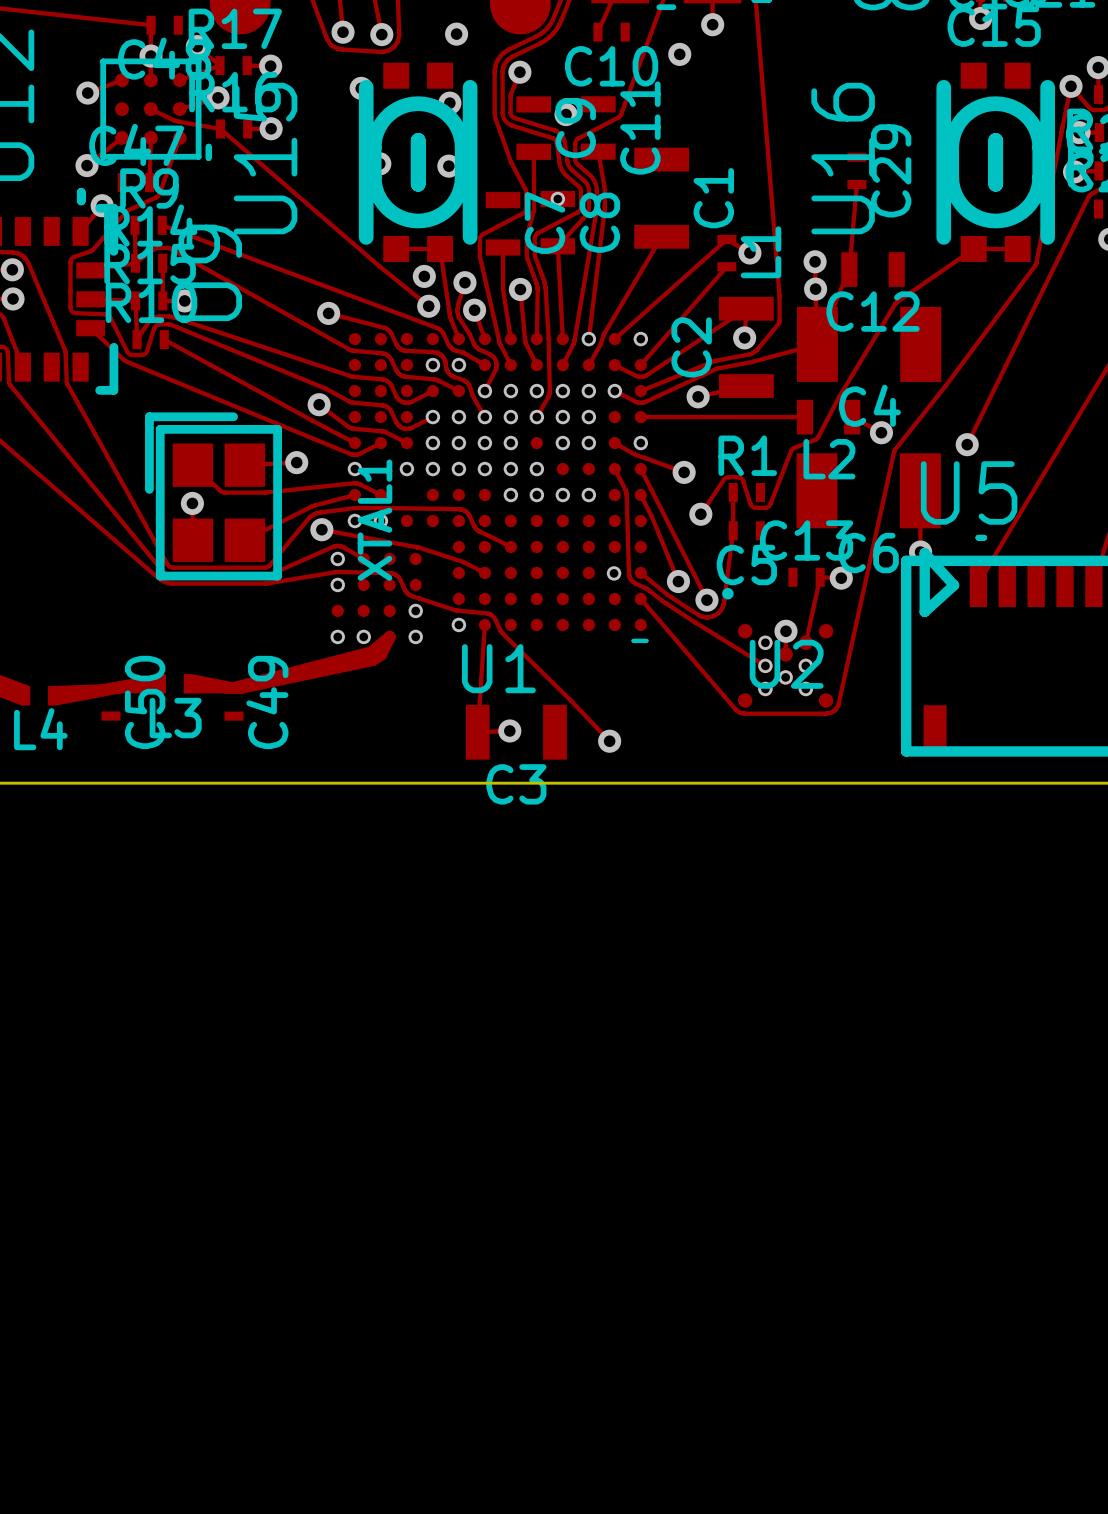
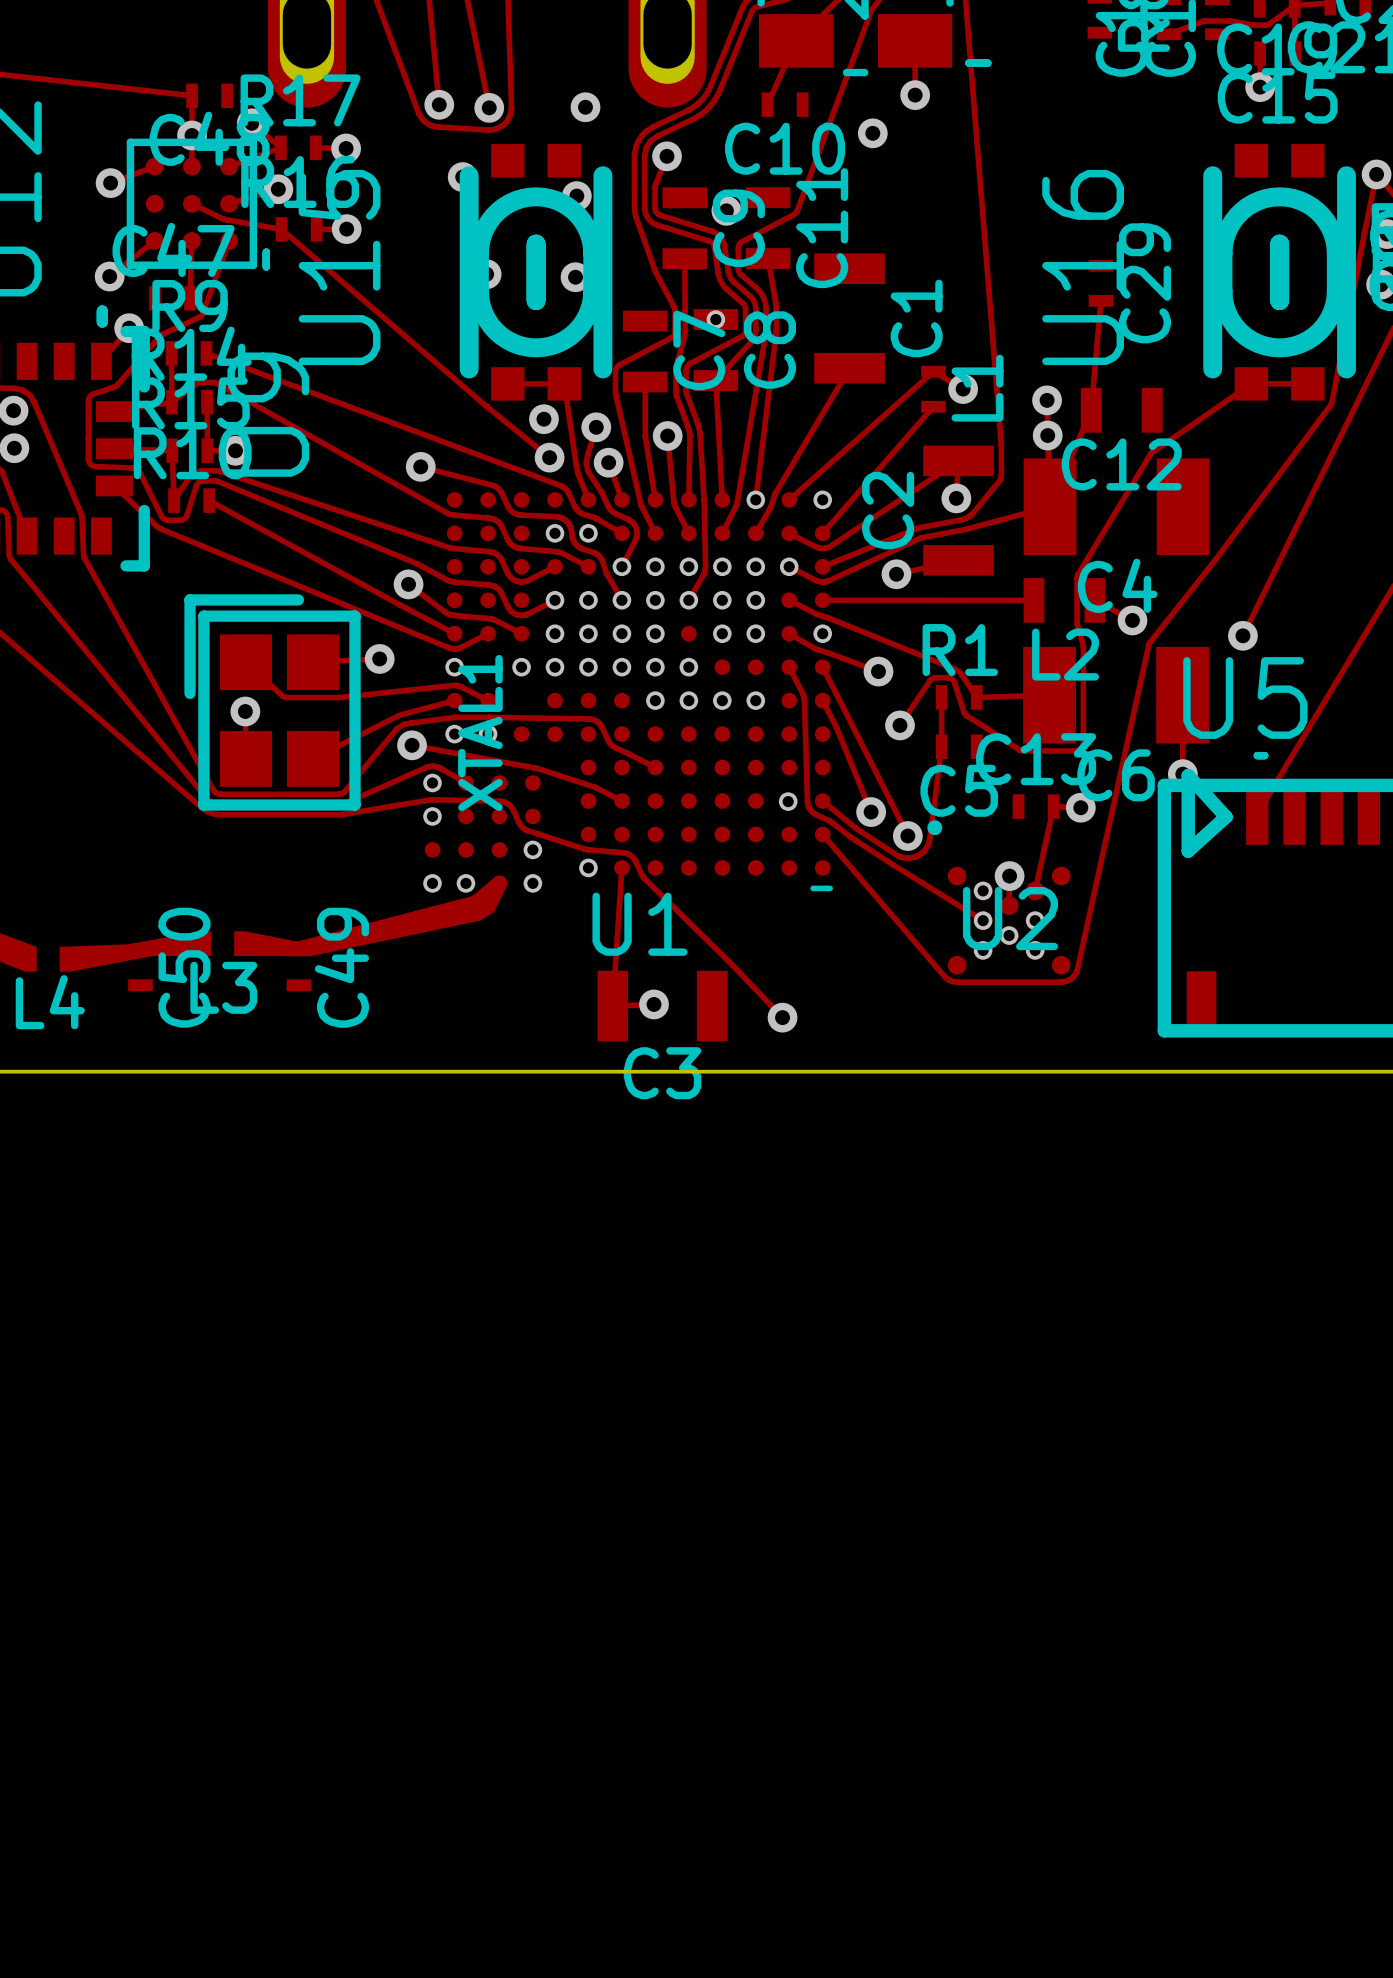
track: (839, 396) (817, 438) (791, 450) (769, 505) (755, 507) (750, 503) -> (1078, 574) (1077, 623) (1083, 646) (1082, 747) (1075, 750) (1021, 750) (986, 728)
track: none -> (789, 600) (816, 614) (955, 669) (961, 674) (976, 697) (1049, 695)
track: none -> (963, 711) (986, 728)

